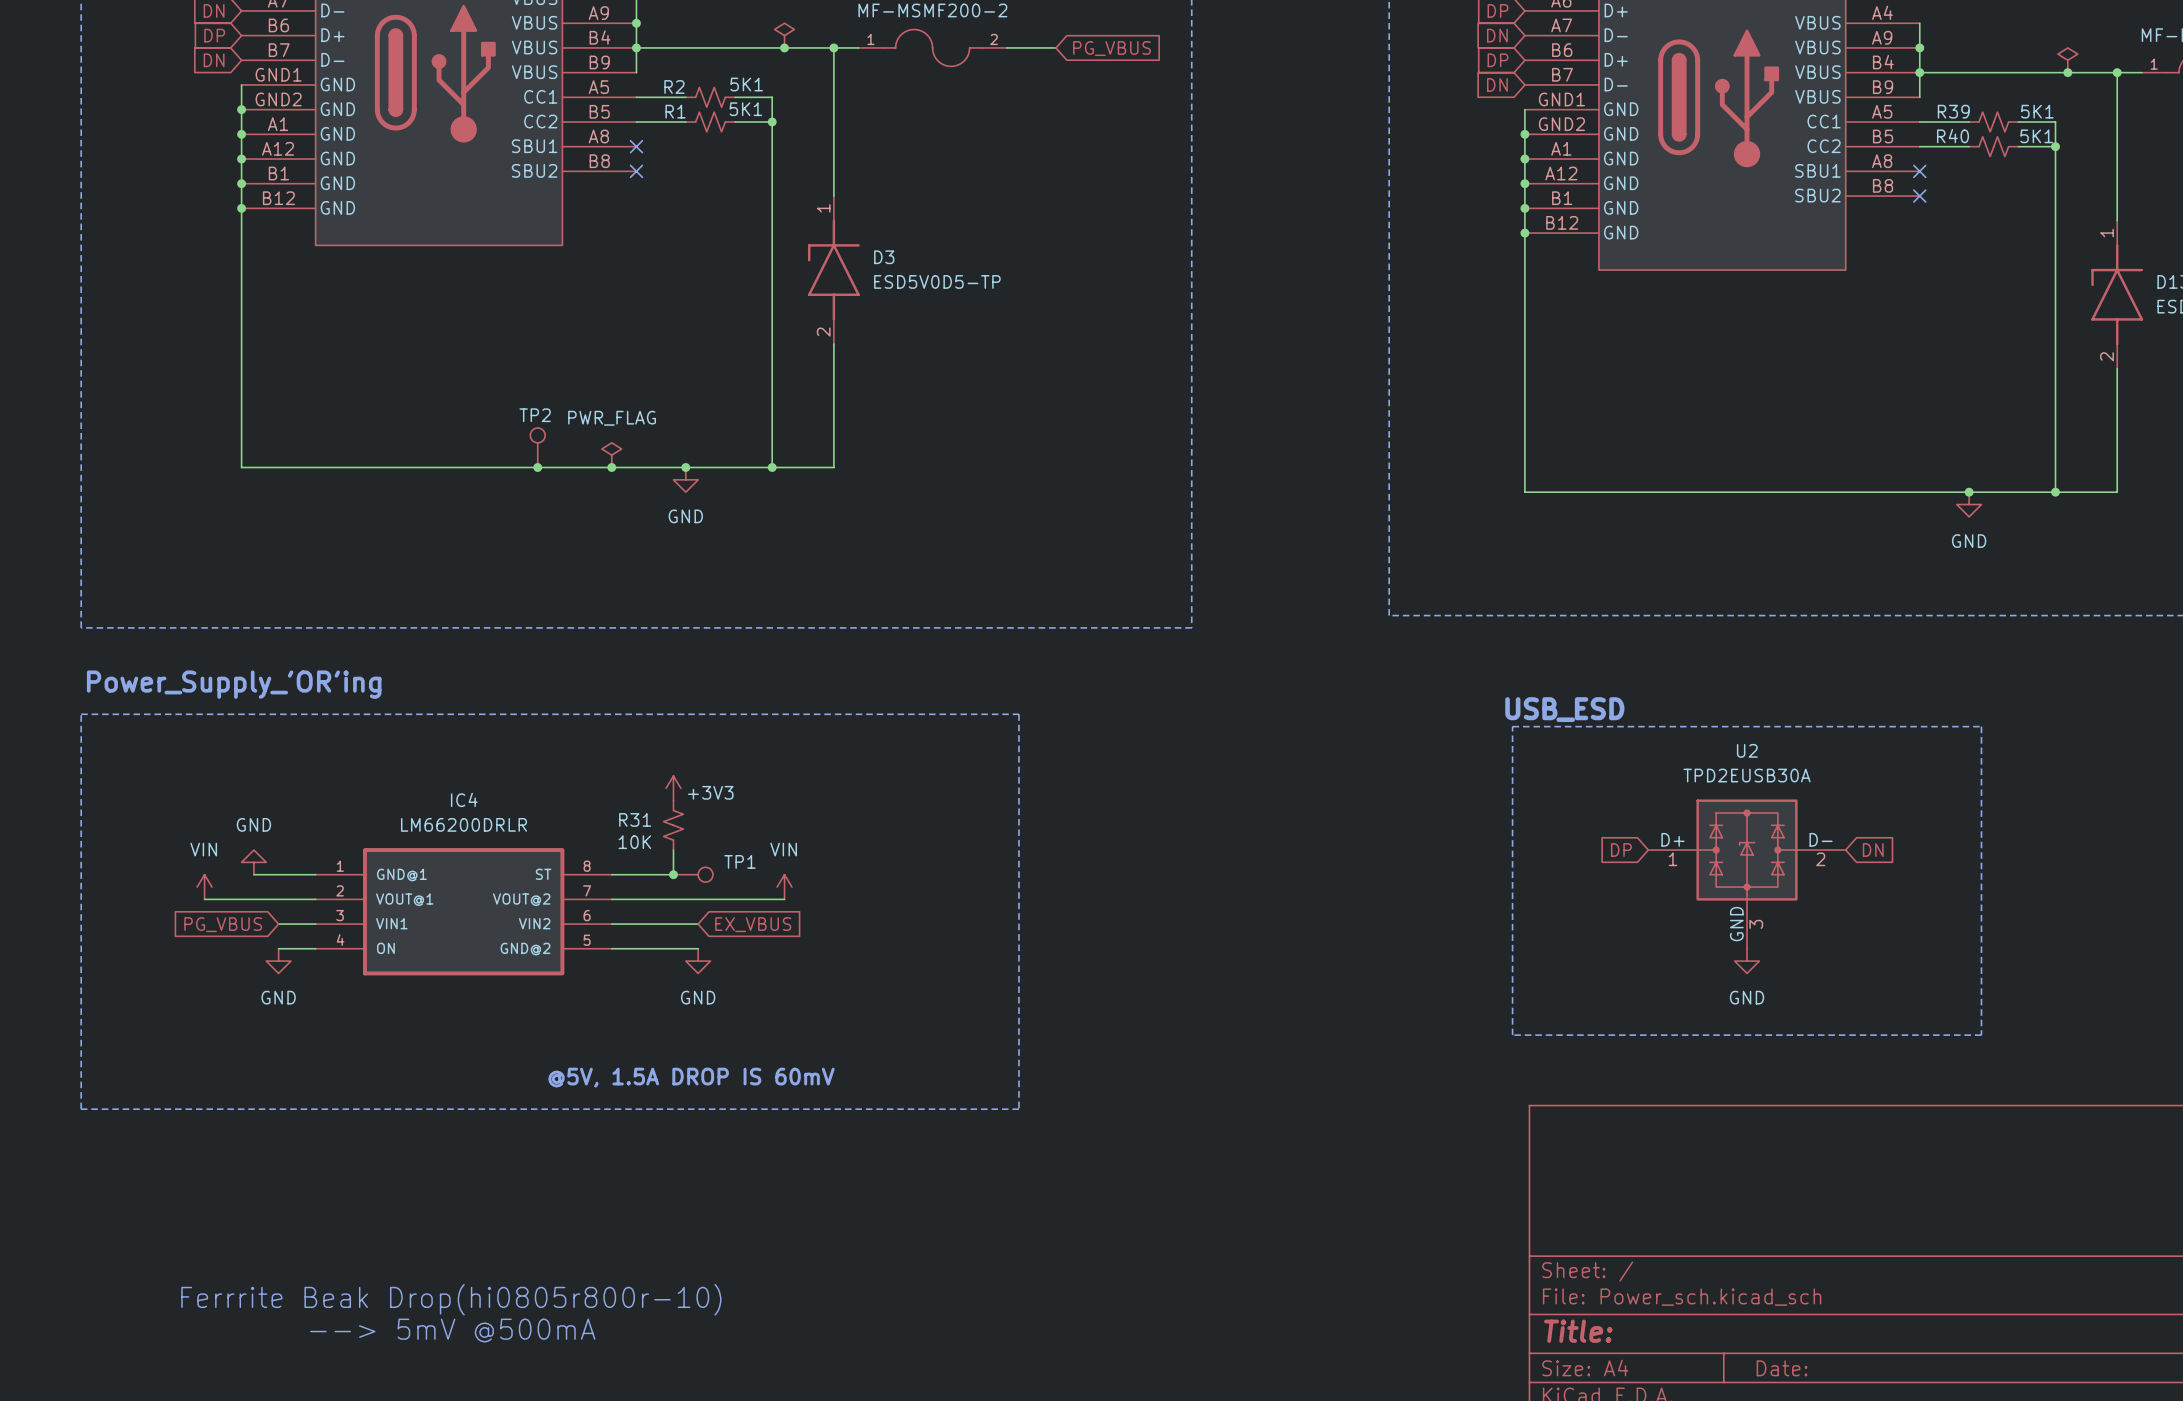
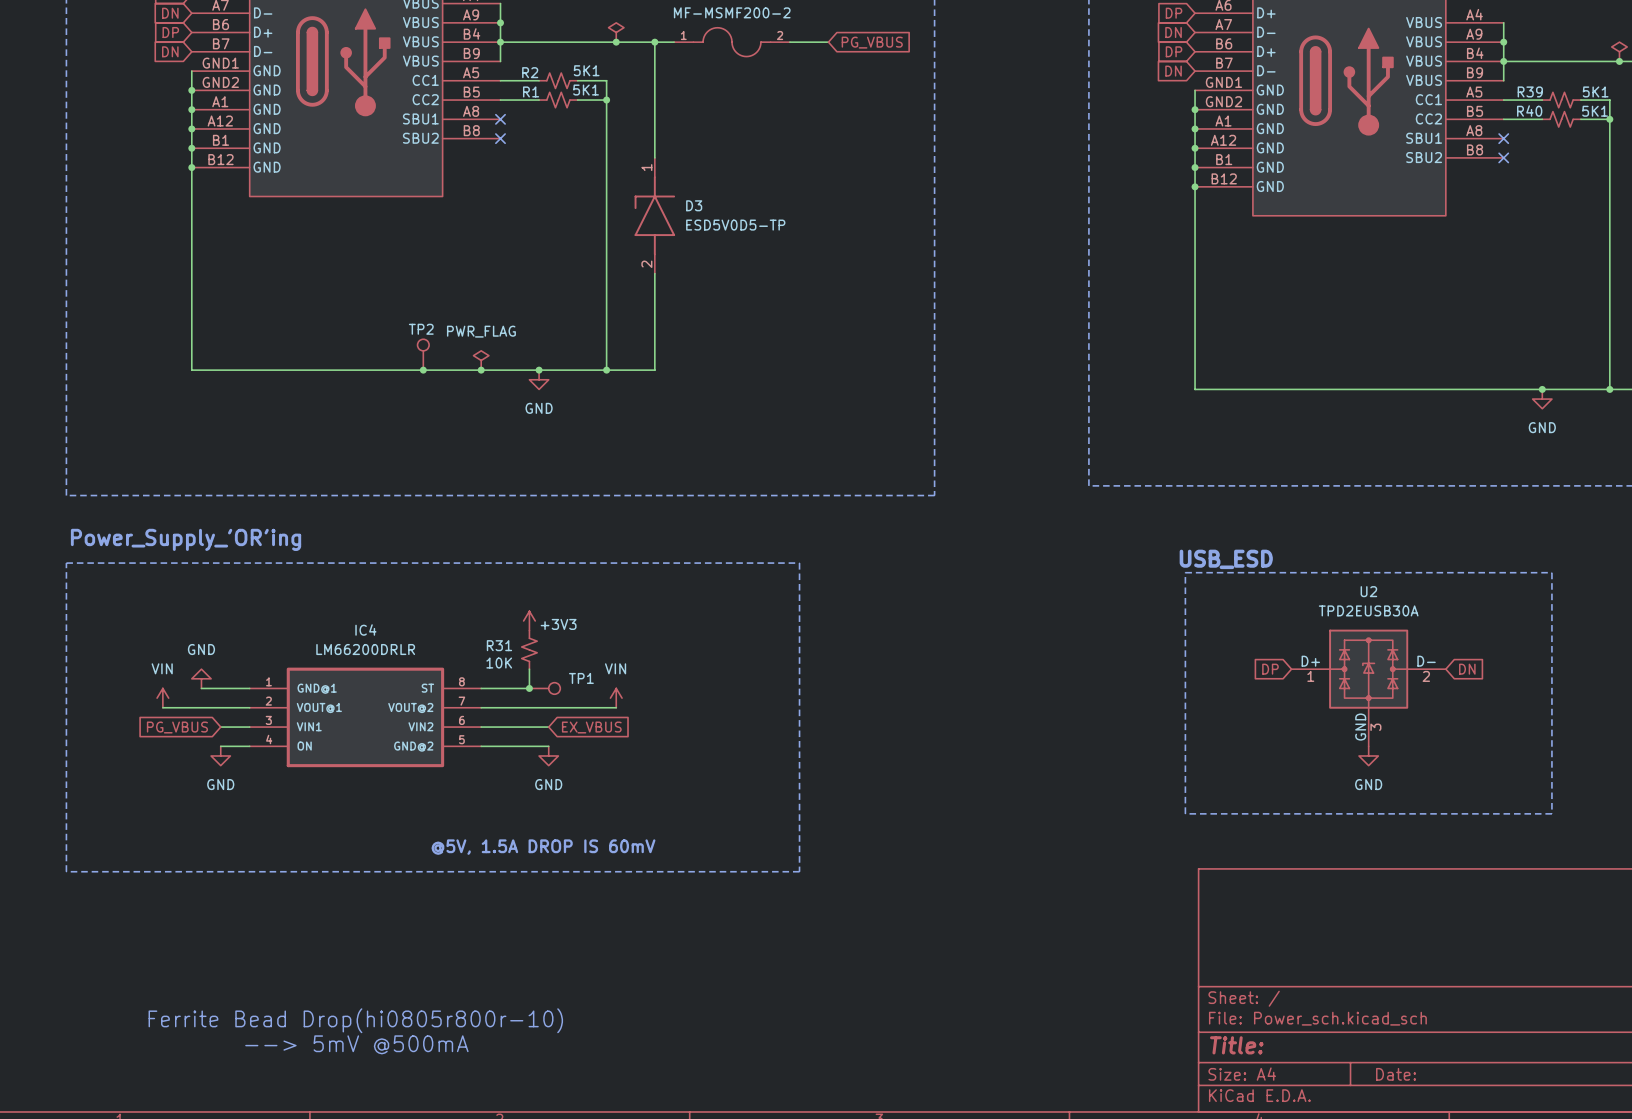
text: Ferrrite Beak Drop(hi0805r800r-10) (451, 1299) -> Ferrite Bead Drop(hi0805r800r-10) (355, 1020)

